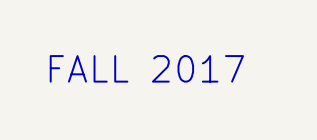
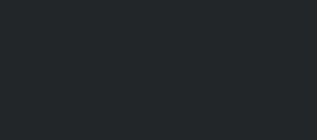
text: FALL 2017 (146, 68) -> none

